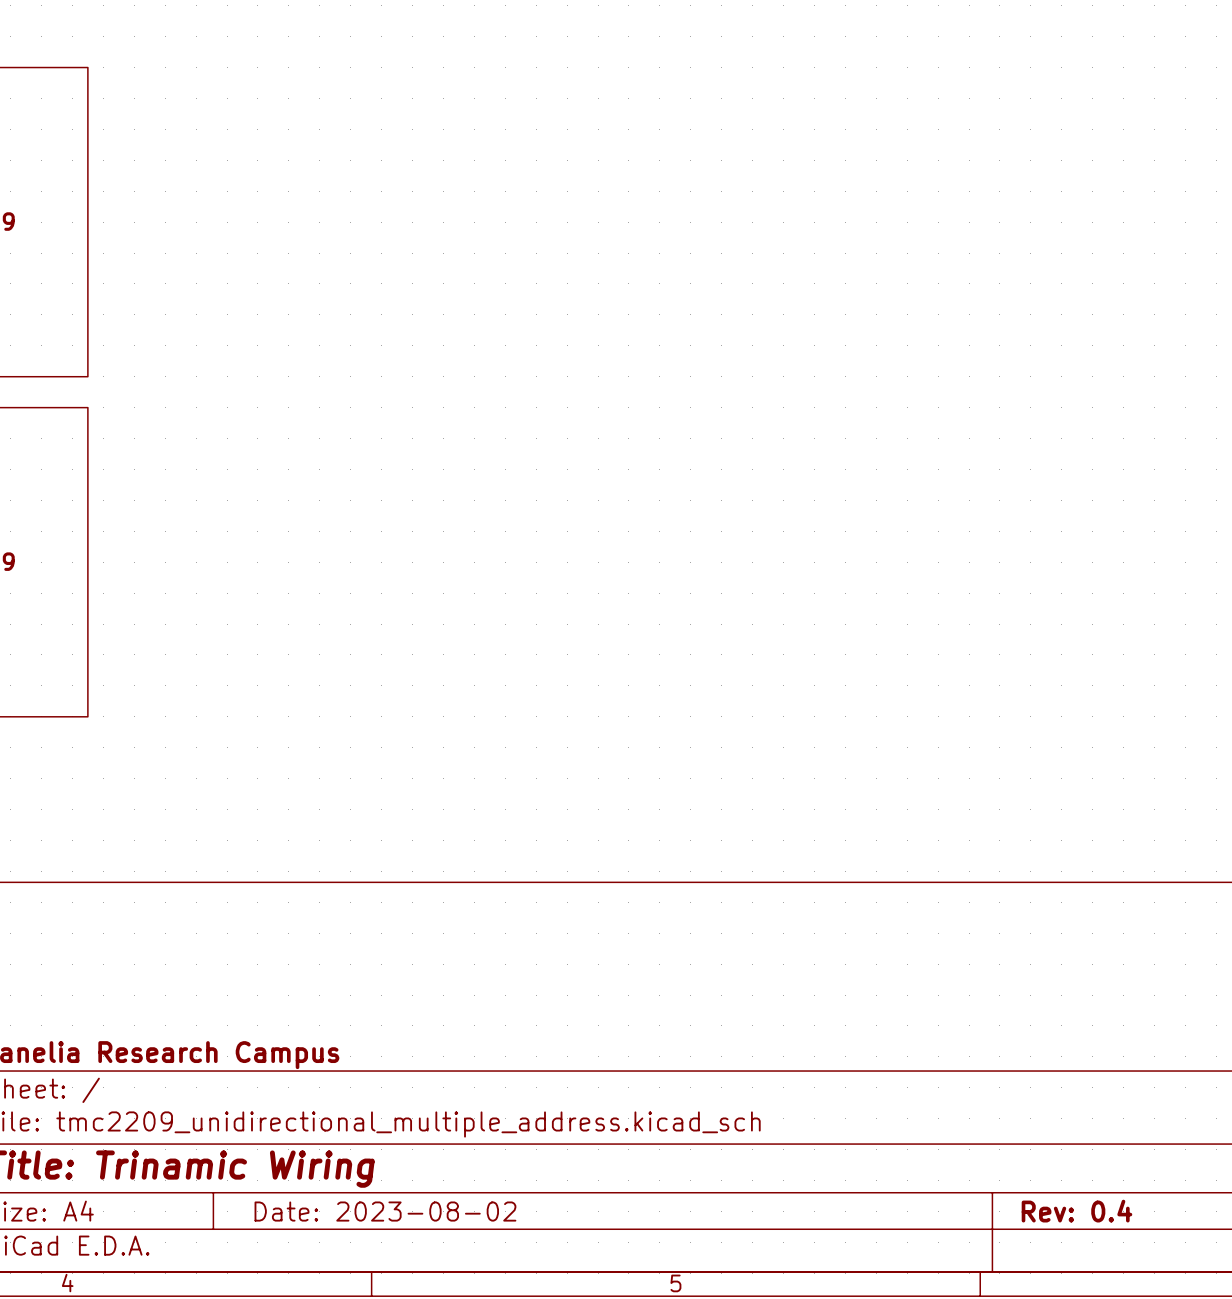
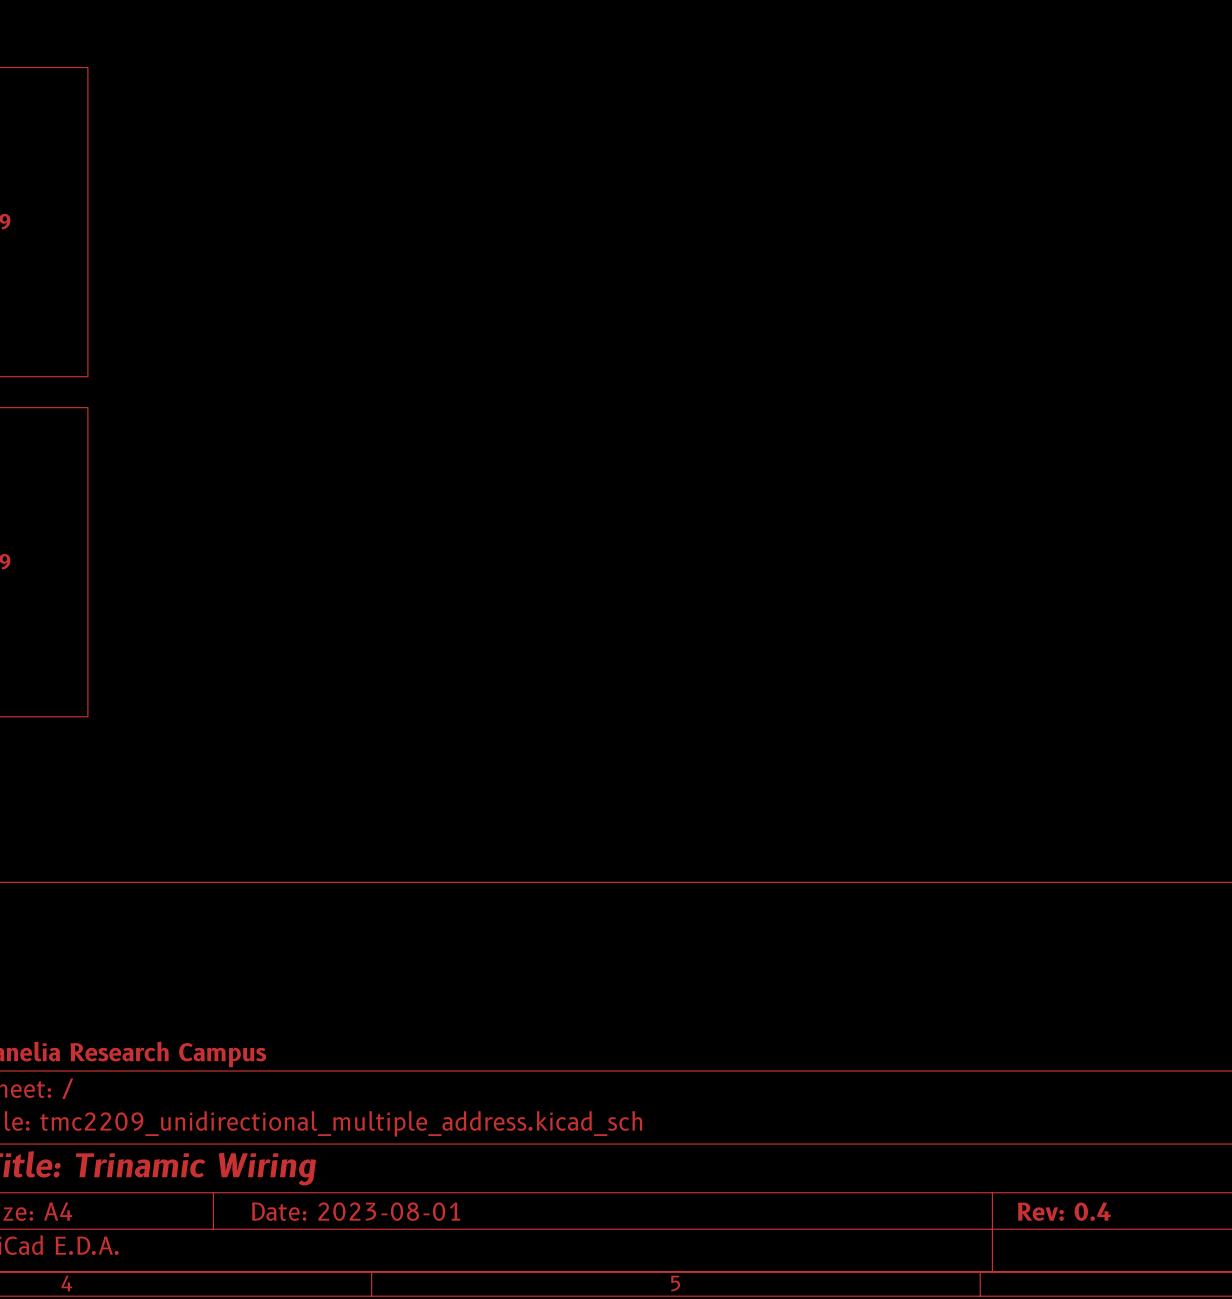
title block: Date: 2023-08-02 (385, 1211) -> Date: 2023-08-01 (356, 1211)

